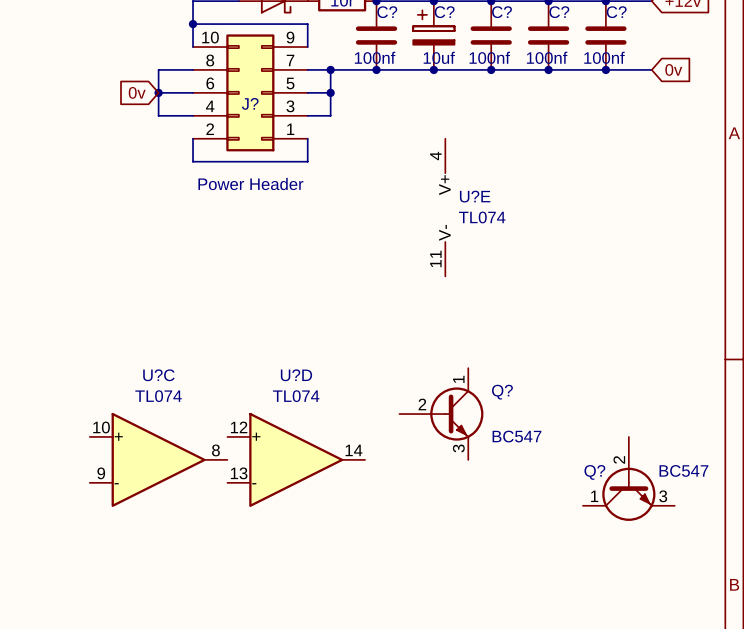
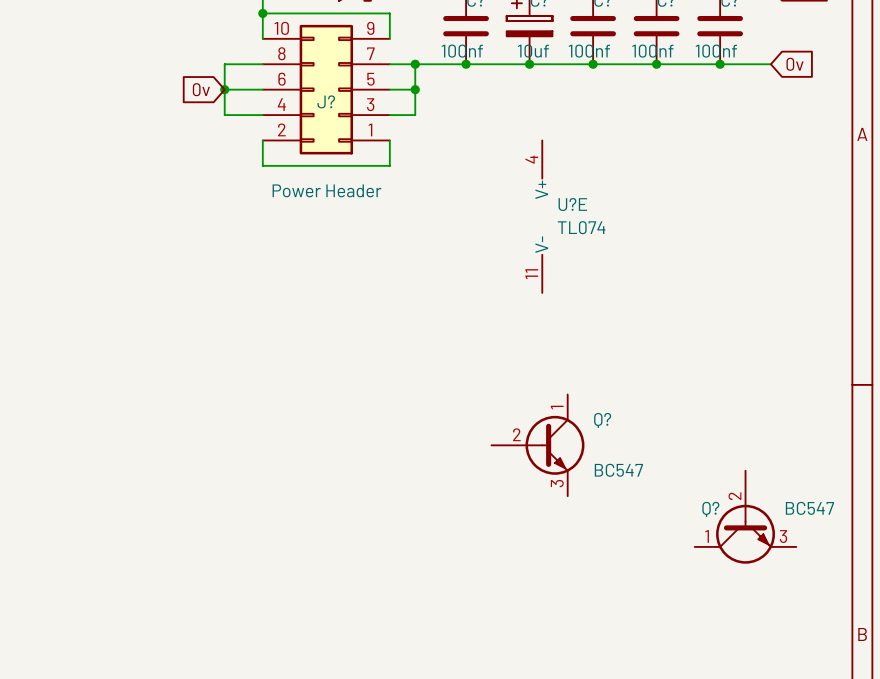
U?C: TL074 (158, 459) -> none
U?D: TL074 (296, 459) -> none

